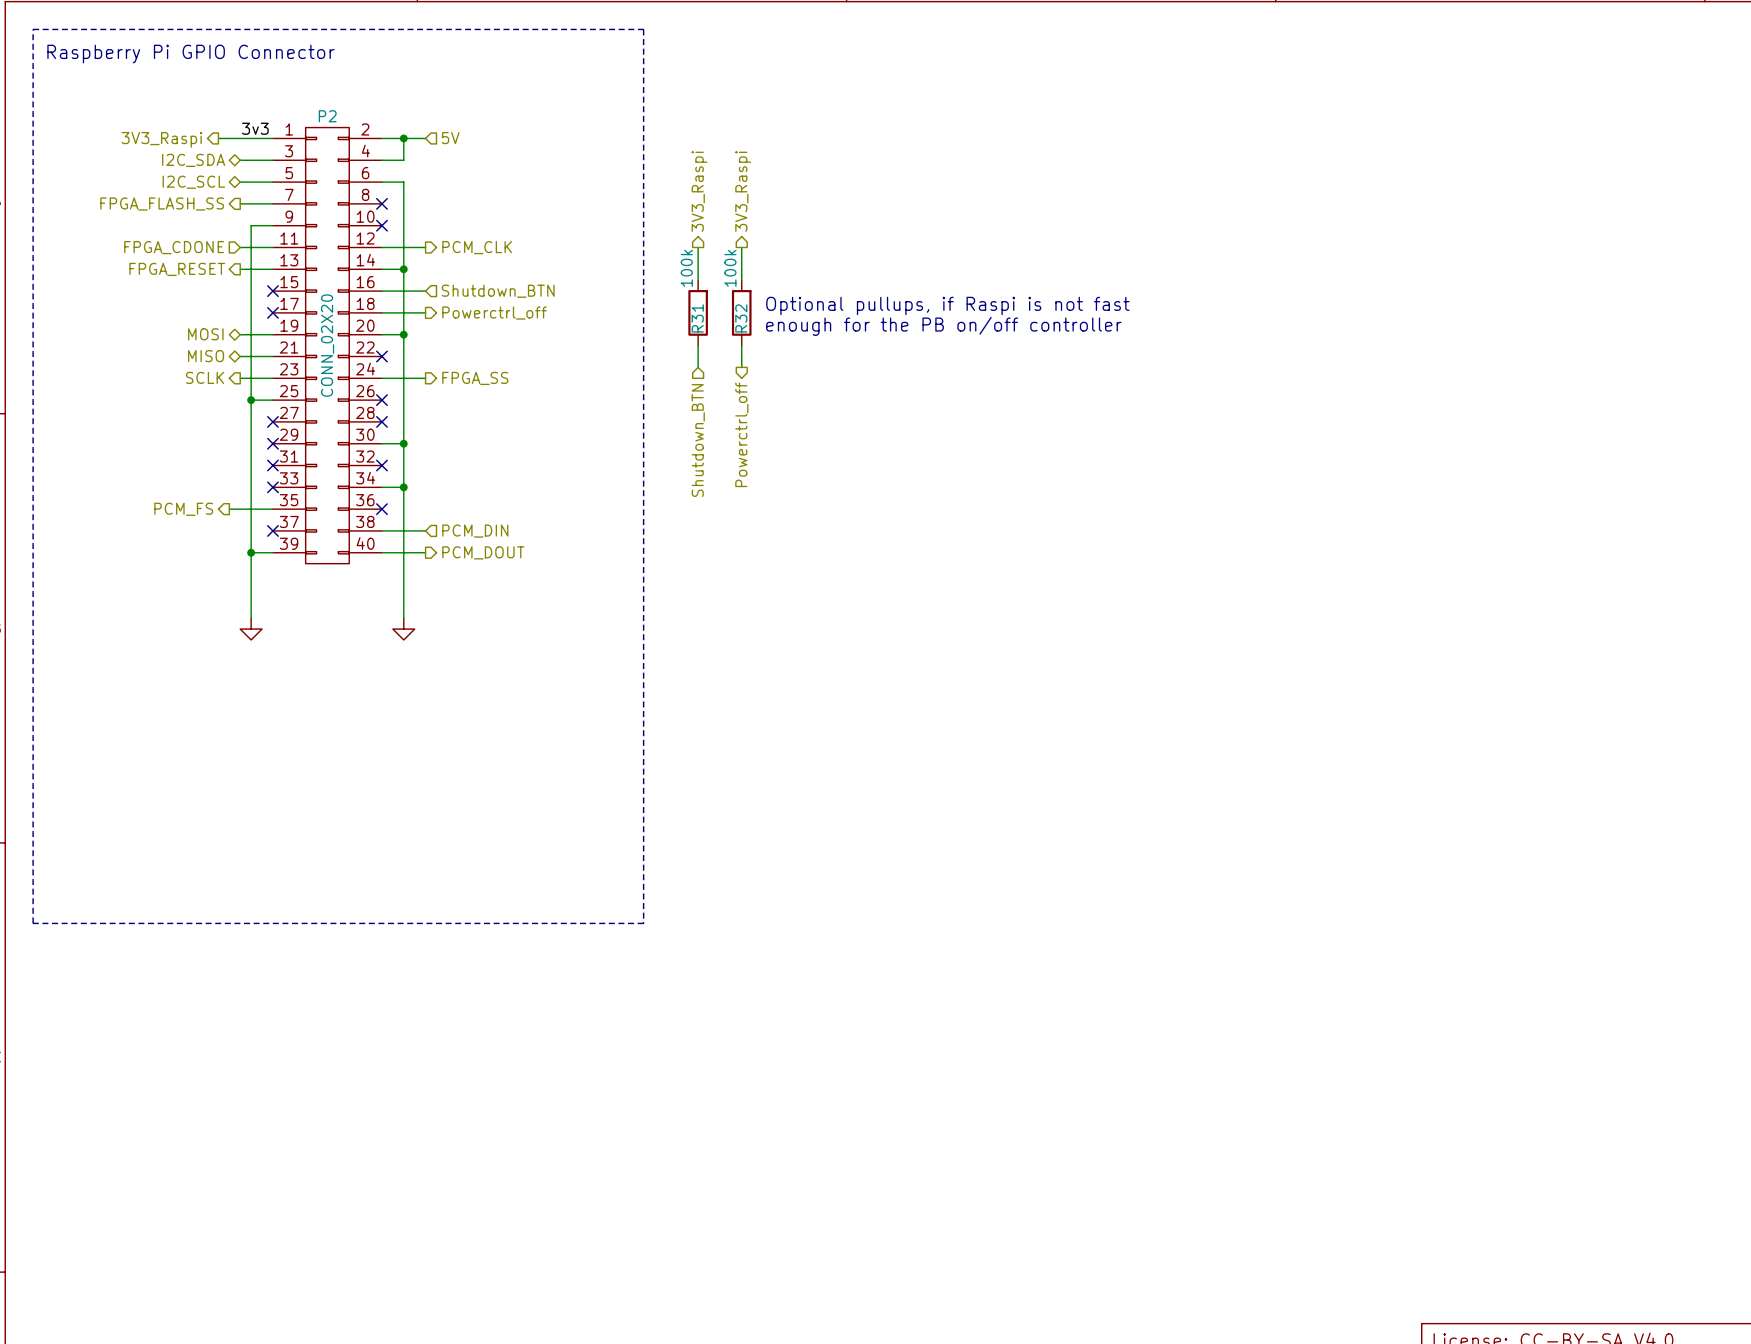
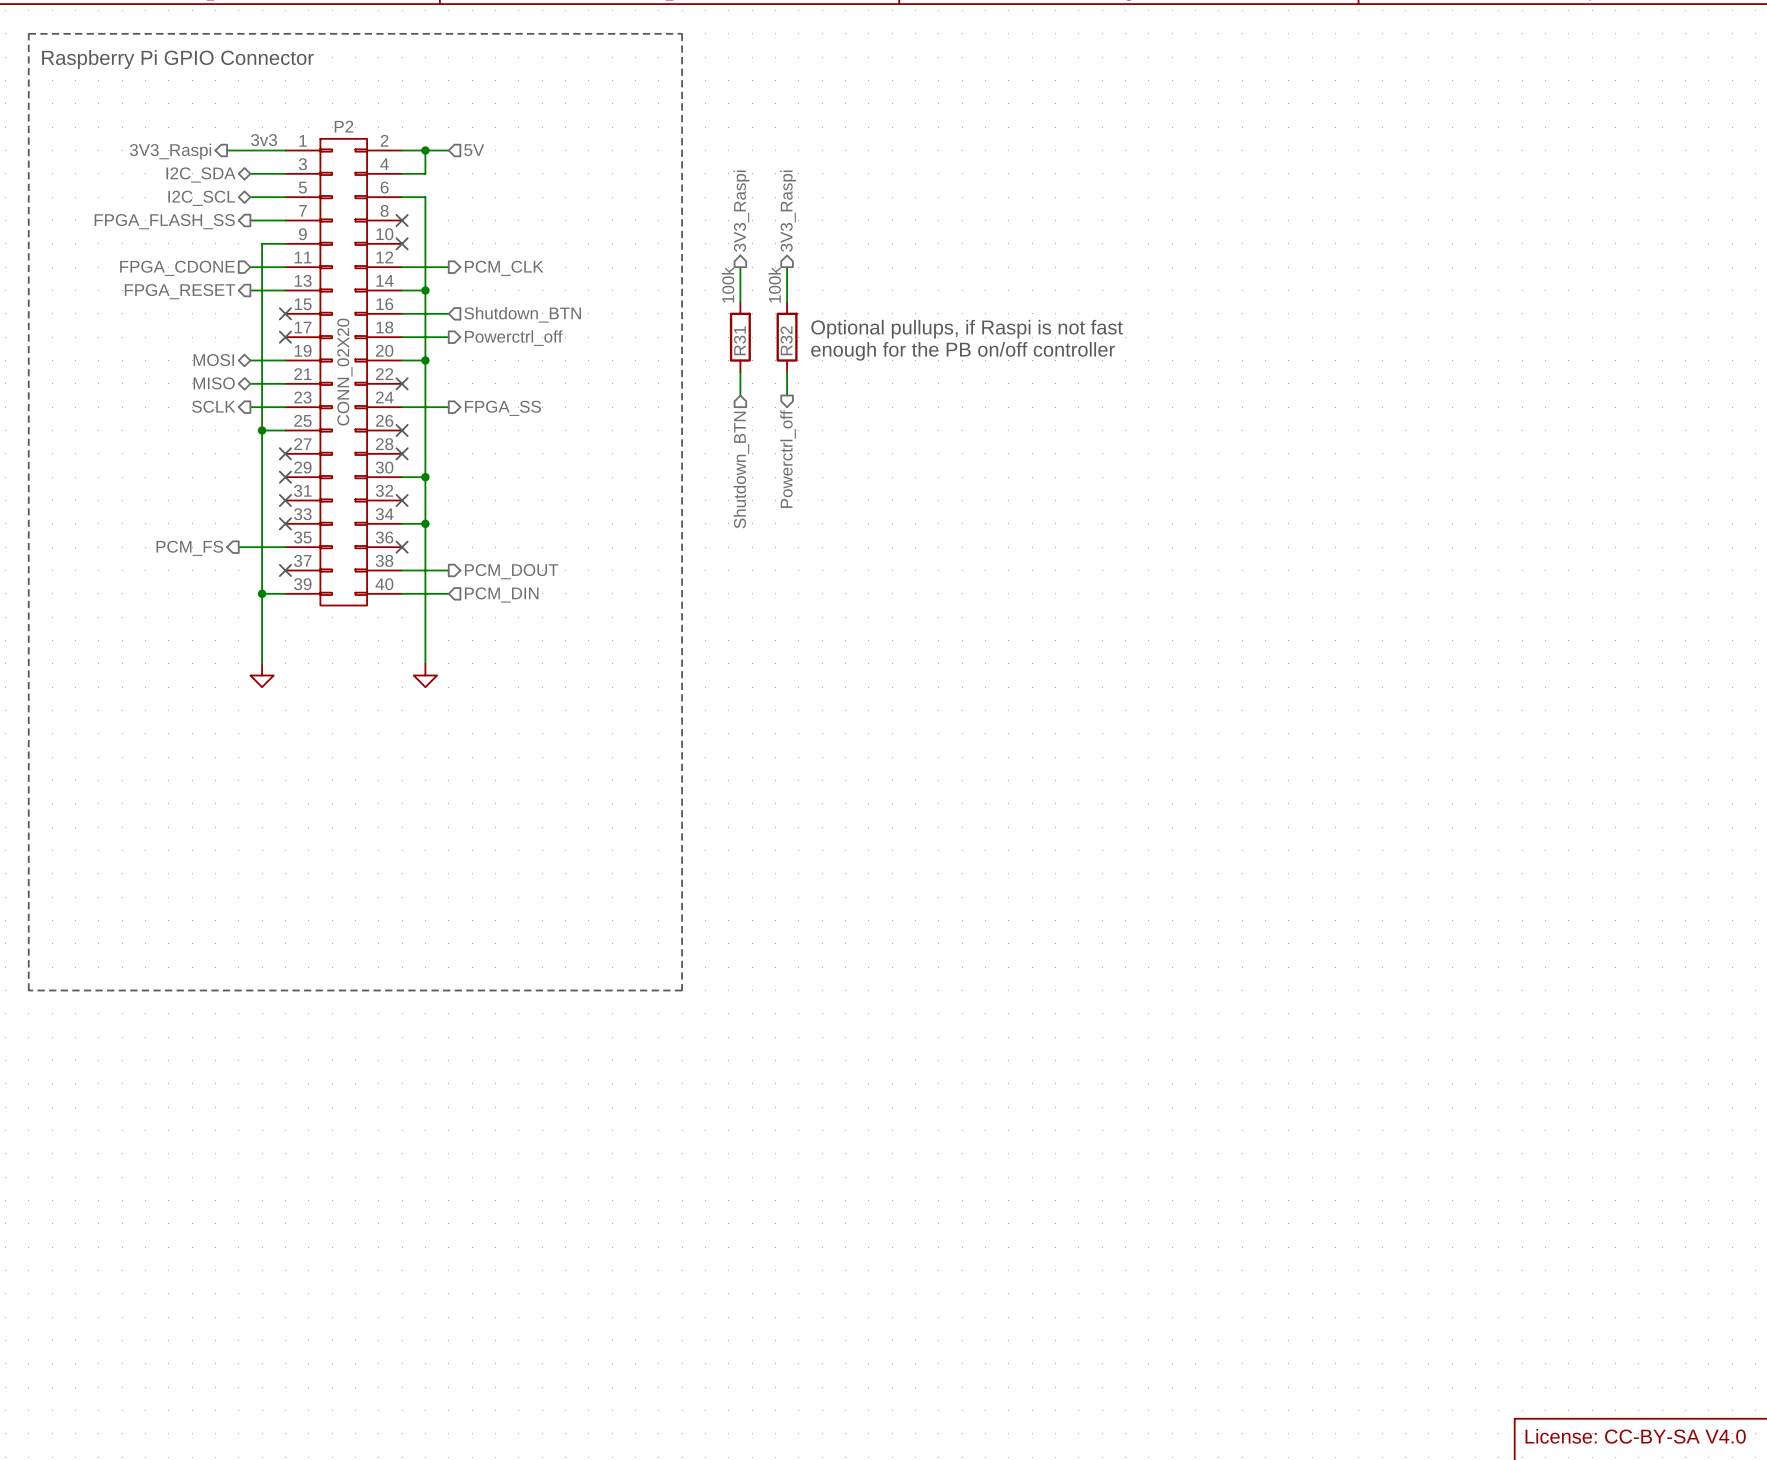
hierarchical label shape: input (475, 531) -> output (511, 571)
hierarchical label: PCM_DIN (475, 531) -> PCM_DOUT (511, 571)
hierarchical label shape: output (483, 552) -> input (501, 595)
hierarchical label: PCM_DOUT (483, 552) -> PCM_DIN (501, 595)

